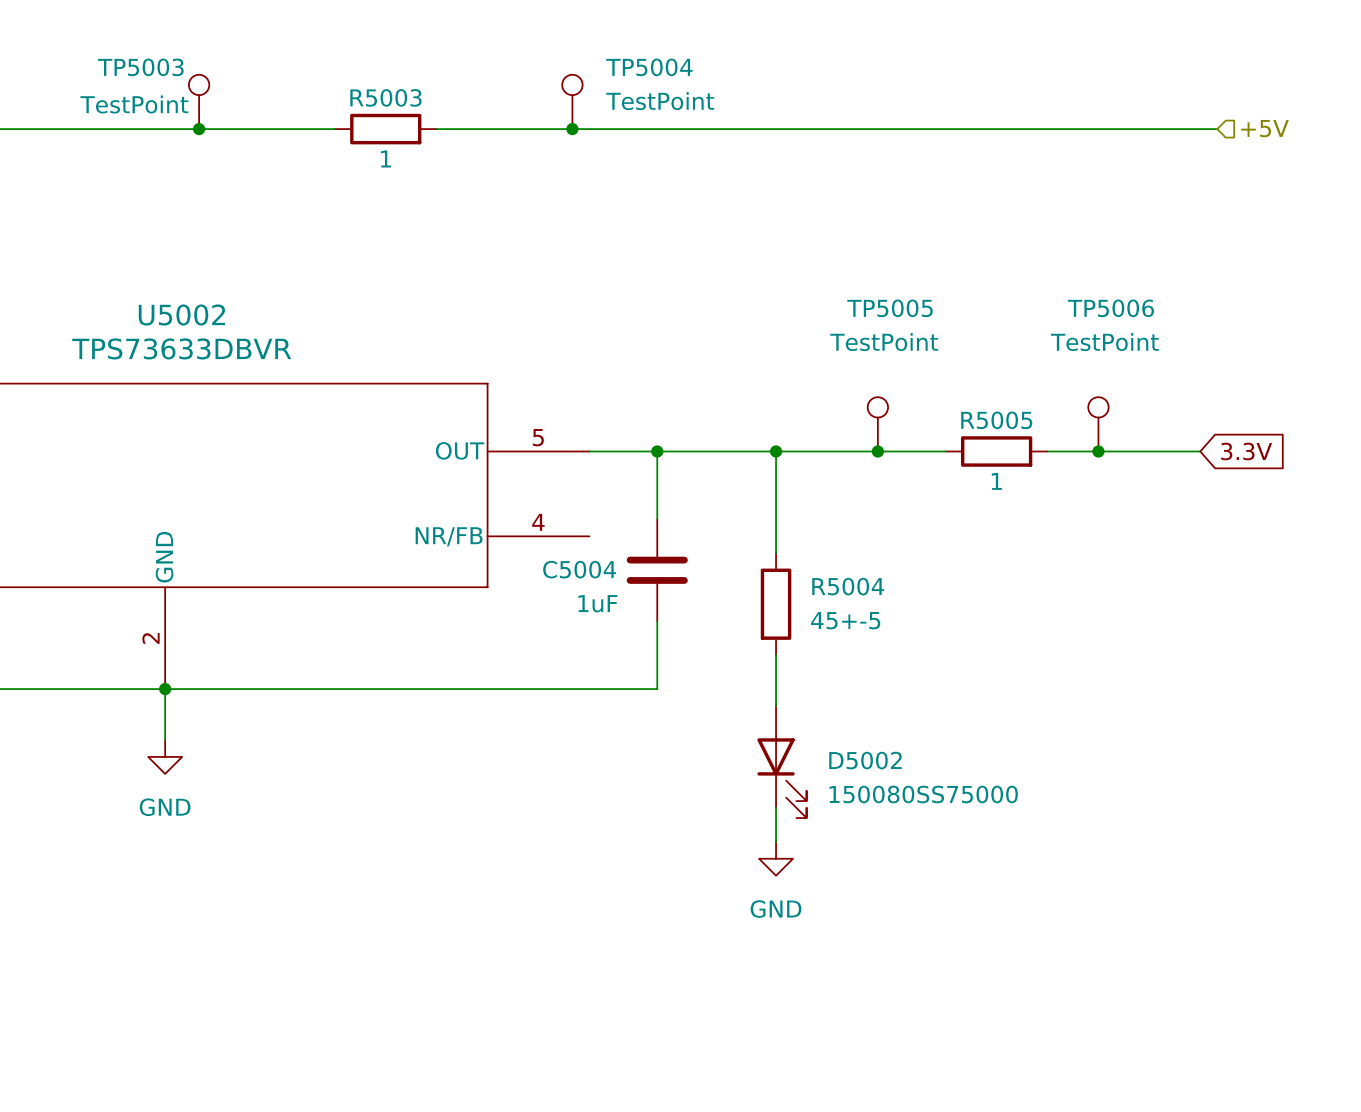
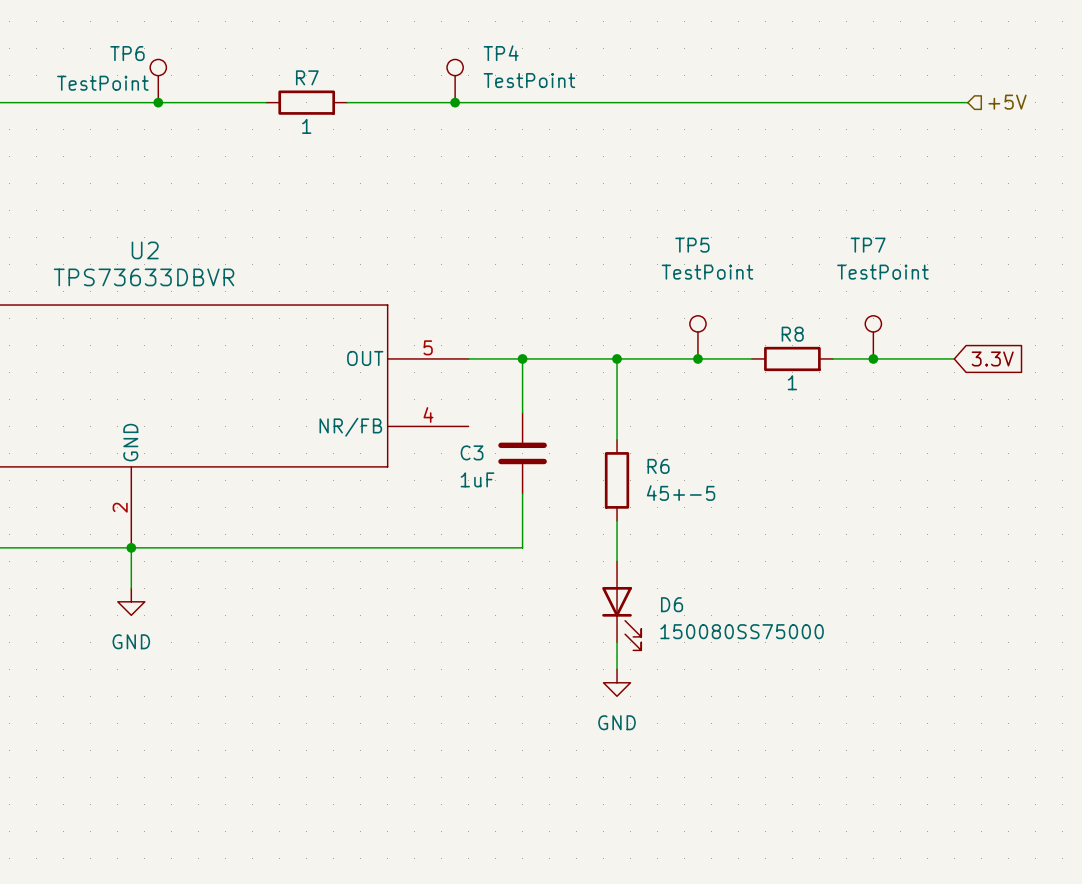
TP5003 name: TP5003 (140, 67) -> TP6 (127, 53)
TP5004 name: TP5004 (649, 67) -> TP4 (501, 53)
R5003 name: R5003 (385, 97) -> R7 (307, 77)
TP5005 name: TP5005 (890, 308) -> TP5 (692, 245)
TP5006 name: TP5006 (1110, 308) -> TP7 (868, 245)
U5002 name: U5002 (181, 314) -> U2 (145, 250)
R5005 name: R5005 (996, 420) -> R8 (792, 334)
C5004 name: C5004 (579, 569) -> C3 (472, 452)
R5004 name: R5004 (848, 586) -> R6 (658, 466)
D5002 name: D5002 (865, 760) -> D6 (672, 604)

